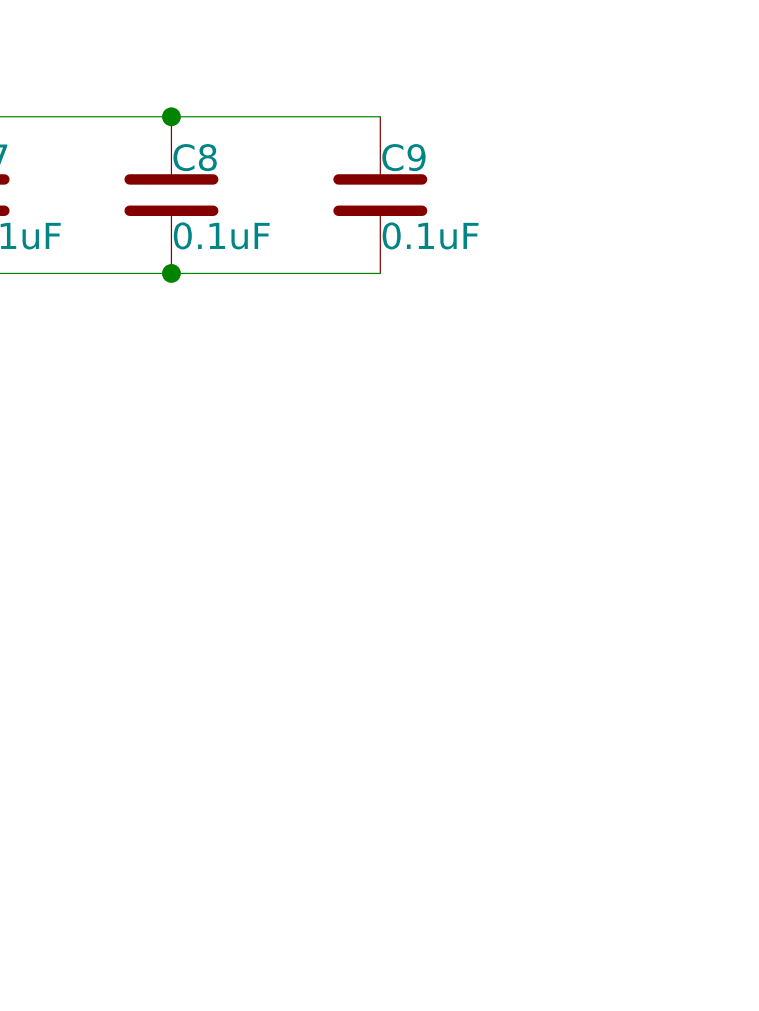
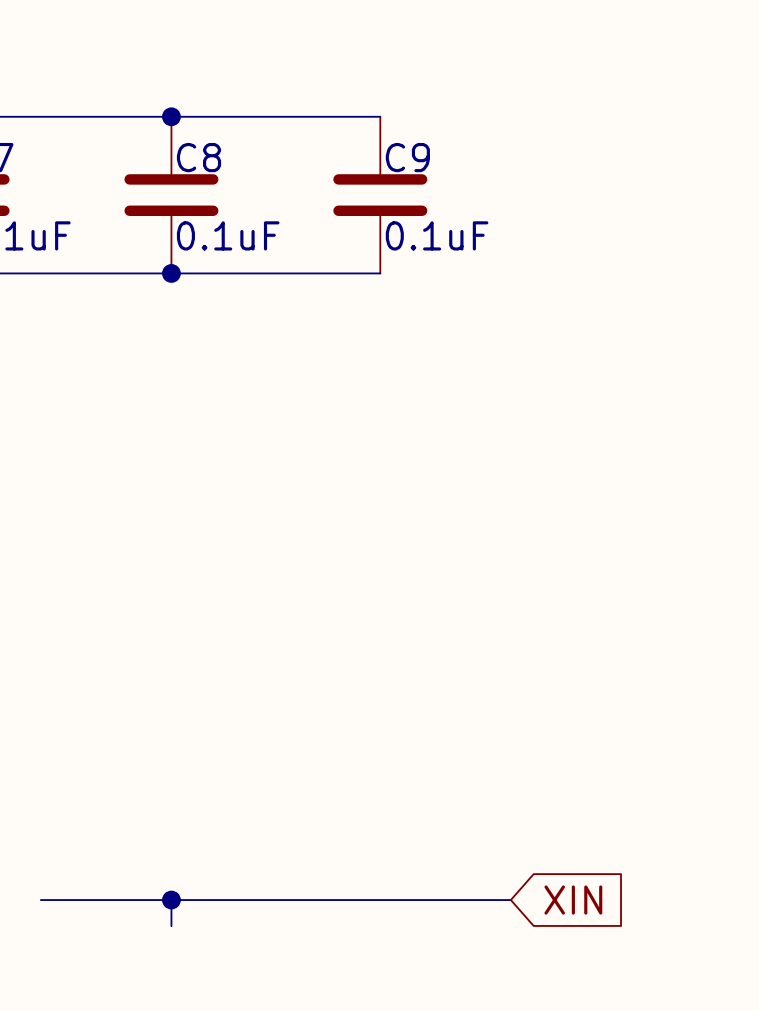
wire: none -> (40, 900) (510, 900)
wire: none -> (171, 900) (171, 926)
junction: none -> (171, 900)
global label: none -> XIN (573, 900)

